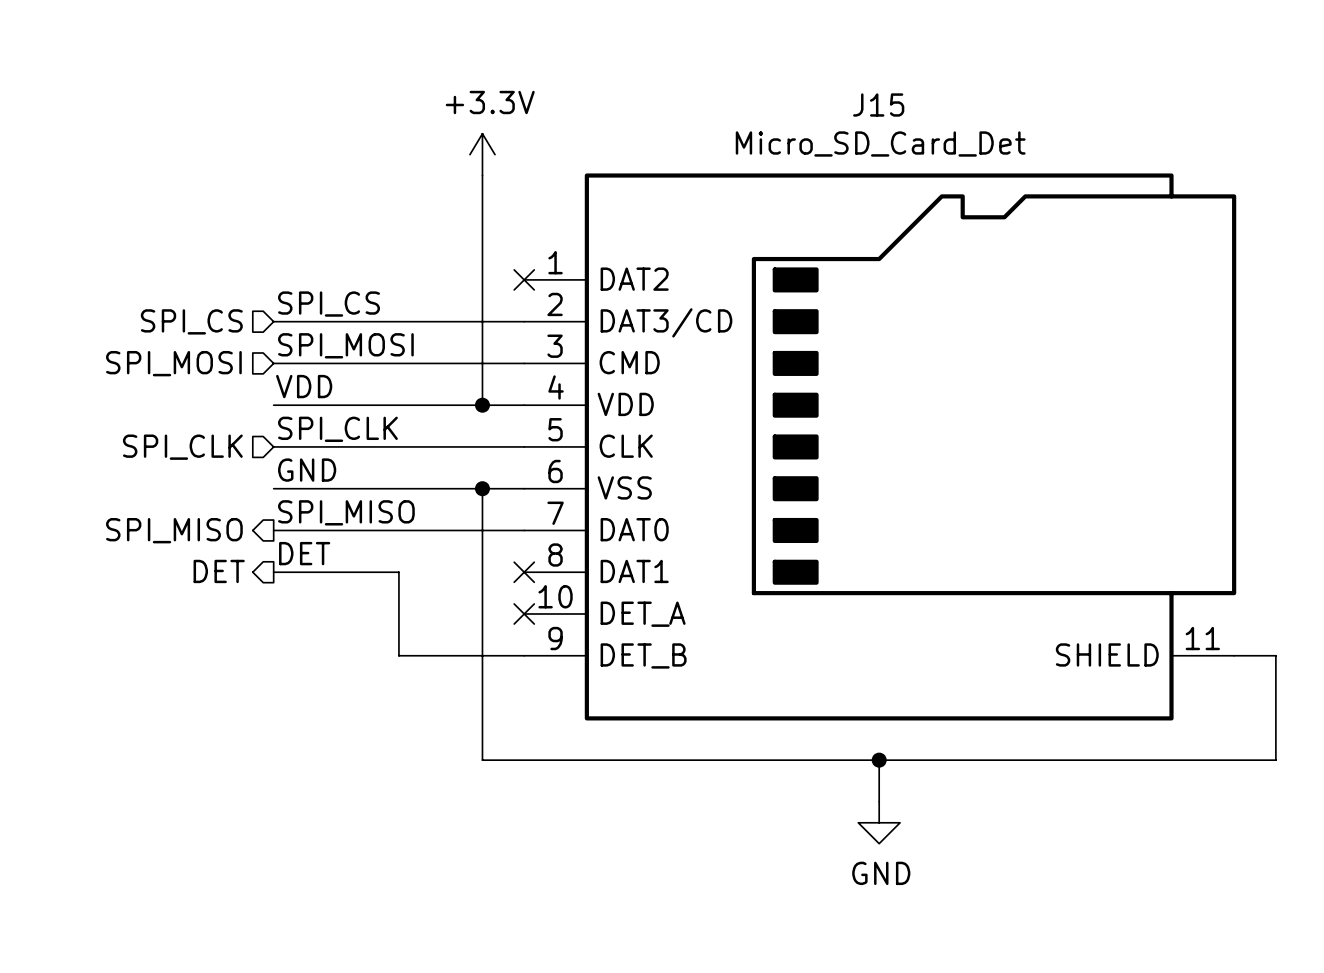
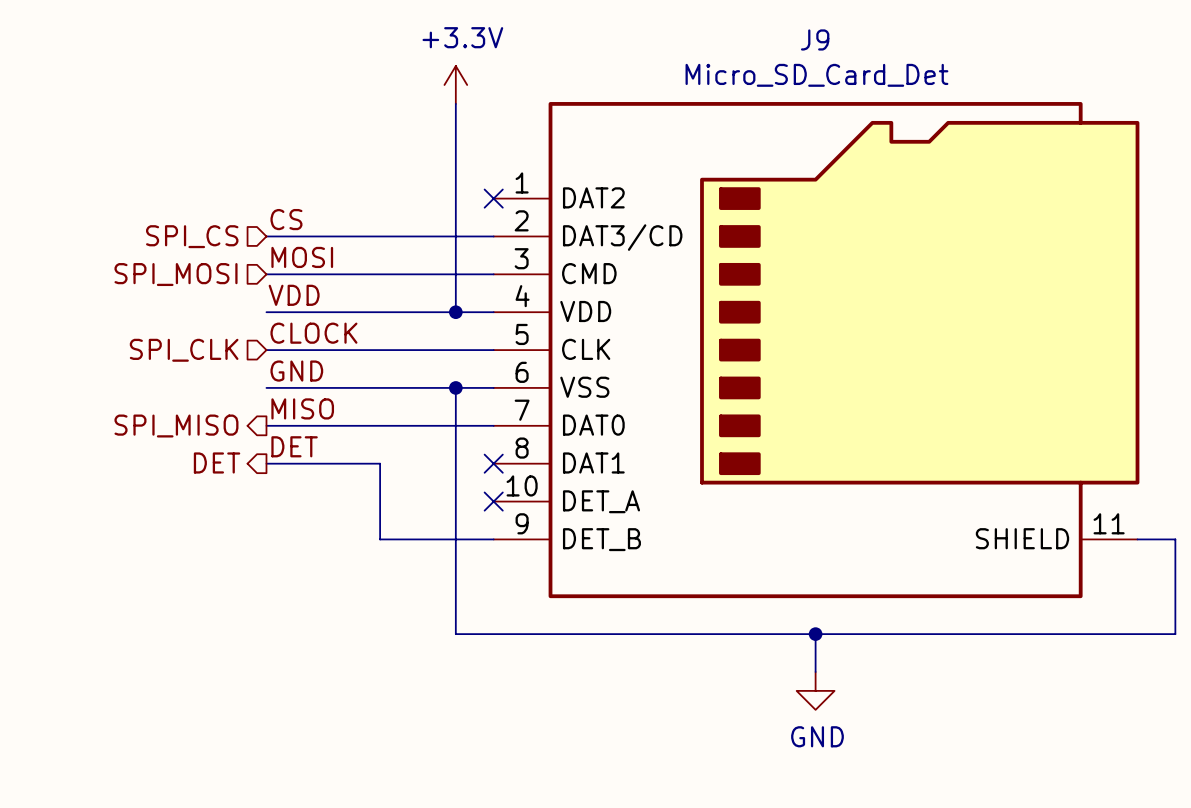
J15 name: J15 (878, 105) -> J9 (815, 39)
label: SPI_CS (329, 304) -> CS (286, 219)
label: SPI_MOSI (345, 345) -> MOSI (302, 257)
label: SPI_CLK (337, 429) -> CLOCK (313, 333)
label: SPI_MISO (346, 512) -> MISO (302, 408)

